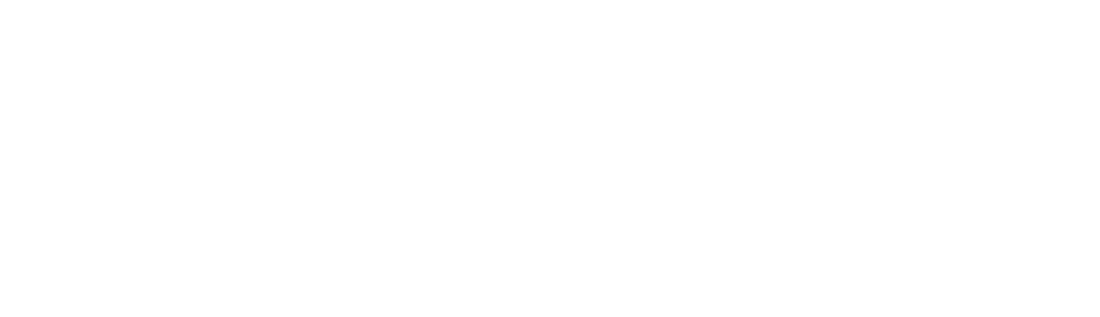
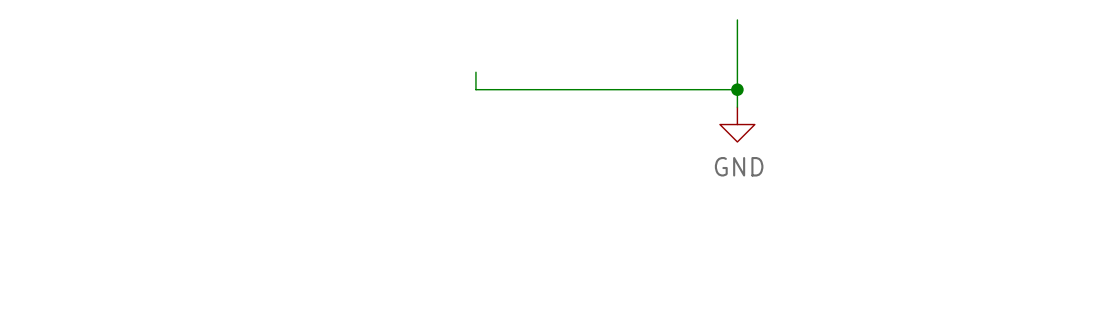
wire: none -> (737, 19) (737, 107)
wire: none -> (475, 72) (475, 89) (737, 89)
junction: none -> (737, 89)
power symbol: none -> GND (737, 124)

